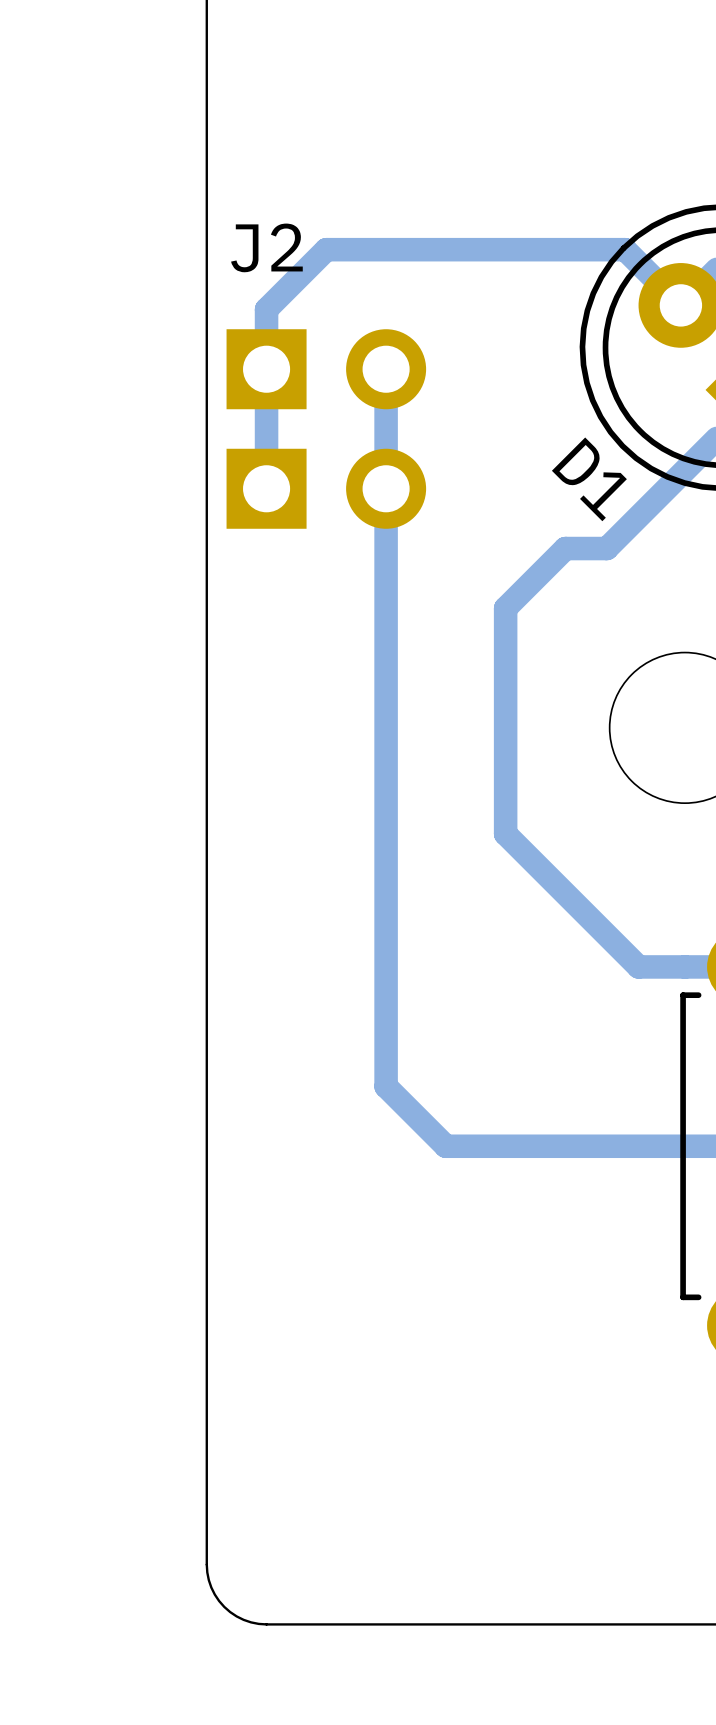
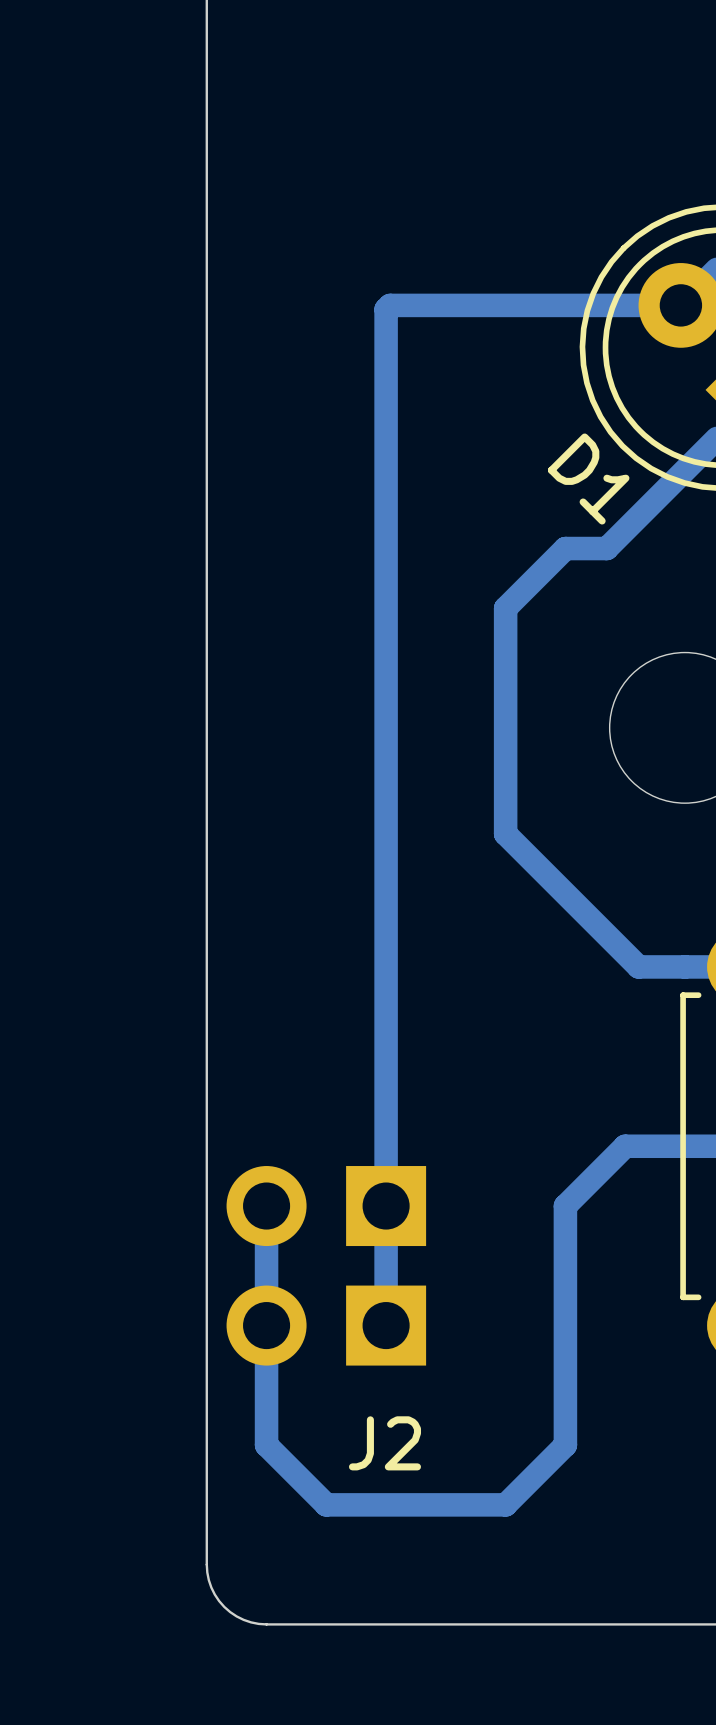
bottom track: (680, 305) (625, 249) (326, 249) (266, 309) (266, 488) -> (680, 305) (390, 305) (386, 309) (386, 369)
part rotation: 0° (326, 369) -> 180° (326, 1325)
part position: (326, 369) -> (326, 1325)
J2 rotation: 0° (326, 488) -> 180° (326, 1206)
J2 position: (326, 488) -> (326, 1206)
bottom track: (386, 1086) (445, 1146) (625, 1146) -> (266, 1206) (266, 1445) (326, 1504) (505, 1504) (565, 1445) (565, 1206) (625, 1146)
bottom track: none -> (386, 1086) (386, 1325)

